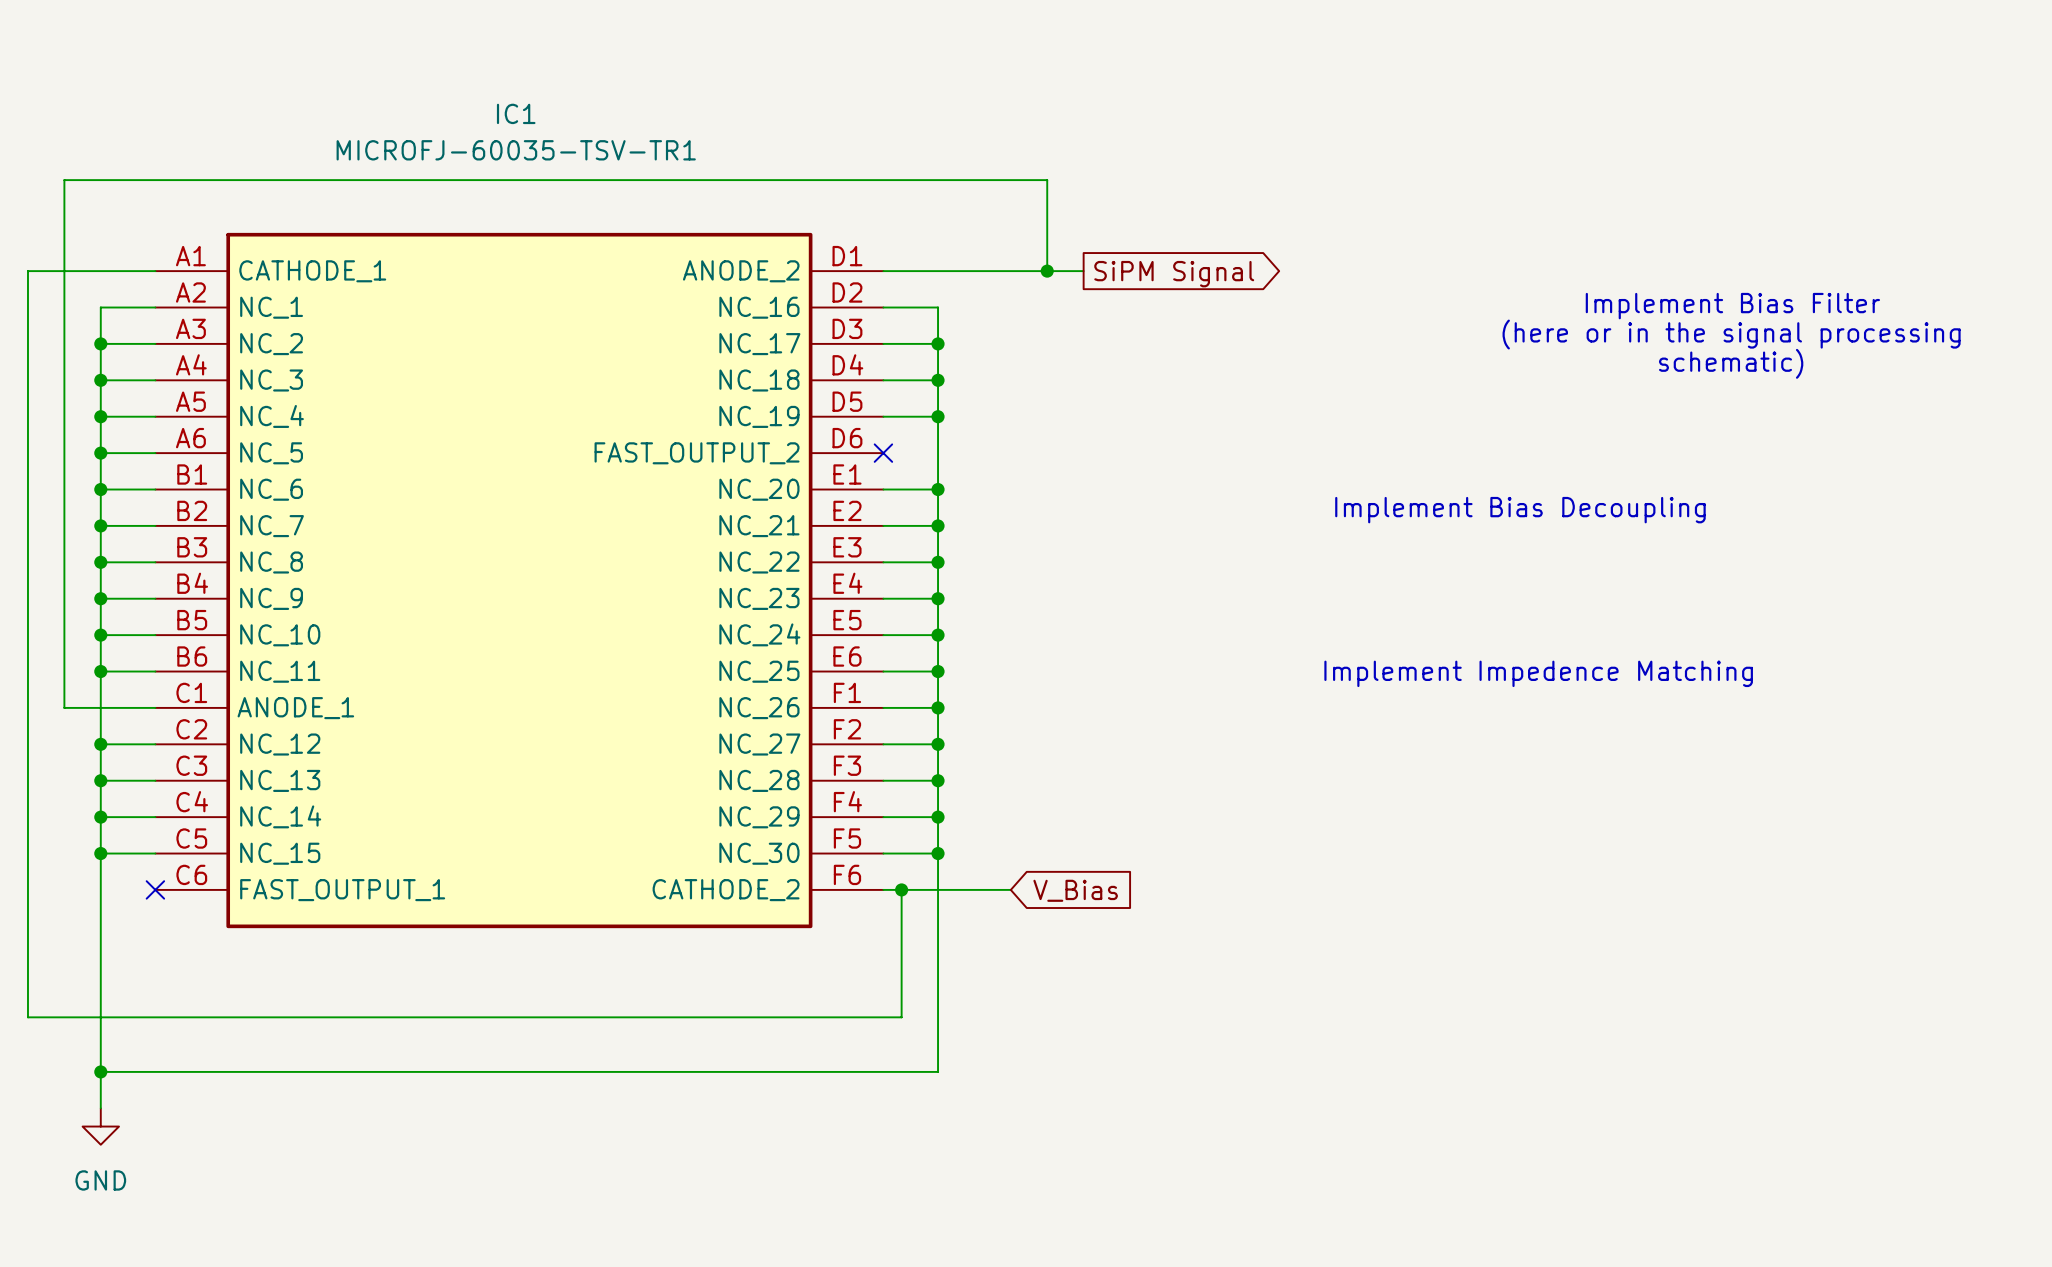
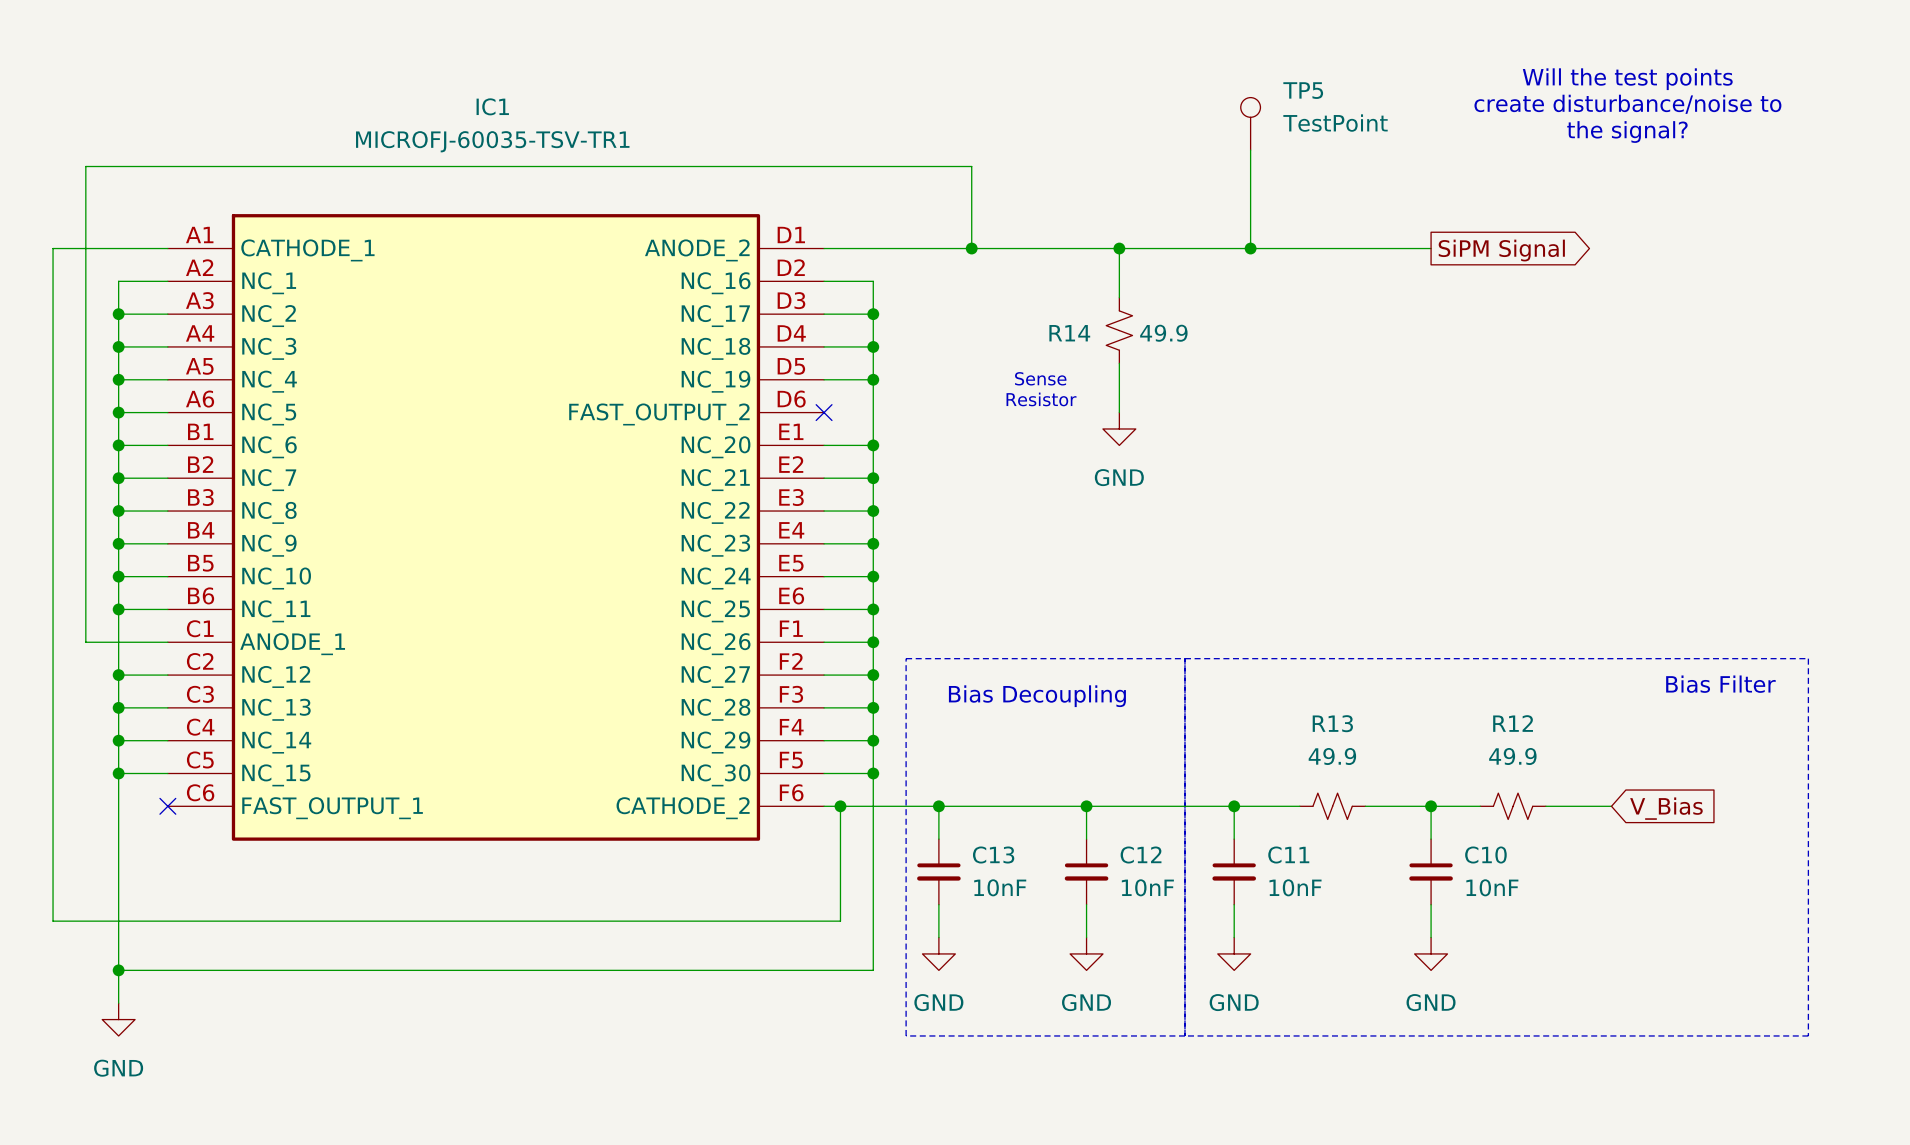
text: none -> Will the test points (1627, 79)
text: none -> create disturbance/noise to (1627, 104)
TP5: none -> TestPoint (1250, 123)
text: none -> the signal? (1627, 132)
wire: none -> (1250, 150) (1250, 248)
wire: none -> (1004, 248) (1431, 248)
wire: none -> (1119, 248) (1119, 297)
junction: none -> (1119, 248)
junction: none -> (1250, 248)
global label: SiPM Signal (1174, 274) -> none
global label: none -> SiPM Signal (1501, 250)
text: Implement Bias Filter (1732, 306) -> none
text: (here or in the signal processing (1731, 334) -> none
R14: none -> 49.9 (1119, 330)
text: schematic) (1731, 363) -> none
wire: none -> (1119, 363) (1119, 412)
text: none -> Sense (1040, 378)
text: none -> Resistor (1041, 399)
power symbol: none -> GND (1119, 428)
text: Implement Bias Decoupling (1520, 510) -> none
text: Implement Impedence Matching (1538, 673) -> none
line: none -> (906, 658) (1808, 658) (1808, 1035) (906, 1035) (906, 658)
line: none -> (1184, 658) (1184, 1035)
text: none -> Bias Filter (1720, 684)
text: none -> Bias Decoupling (1037, 696)
junction: none -> (938, 806)
wire: none -> (1086, 806) (1086, 839)
junction: none -> (1086, 806)
wire: none -> (1234, 806) (1234, 839)
junction: none -> (1234, 806)
wire: none -> (1299, 806) (938, 806) (938, 839)
R13: none -> 49.9 (1332, 806)
wire: none -> (1365, 806) (1480, 806)
wire: none -> (1431, 806) (1431, 839)
junction: none -> (1431, 806)
R12: none -> 49.9 (1513, 806)
wire: none -> (1545, 806) (1611, 806)
global label: V_Bias (1075, 890) -> none
global label: none -> V_Bias (1666, 808)
C13: none -> 10nF (938, 871)
C12: none -> 10nF (1086, 871)
C11: none -> 10nF (1234, 871)
C10: none -> 10nF (1431, 871)
wire: none -> (938, 904) (938, 937)
wire: none -> (1086, 904) (1086, 937)
wire: none -> (1234, 904) (1234, 937)
wire: none -> (1431, 904) (1431, 937)
power symbol: none -> GND (938, 953)
power symbol: none -> GND (1086, 953)
power symbol: none -> GND (1234, 953)
power symbol: none -> GND (1431, 953)

